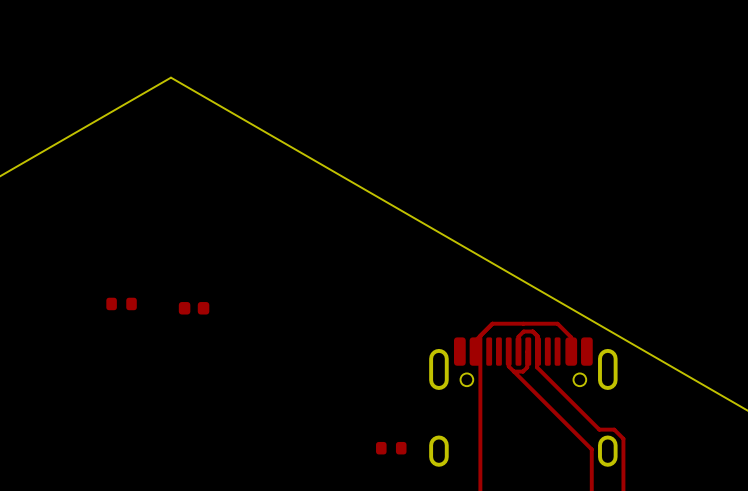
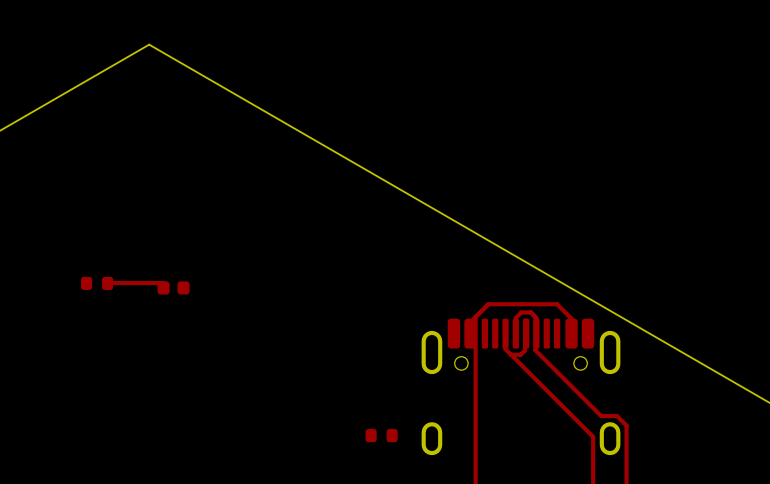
top track: none -> (163, 283) (107, 283)

